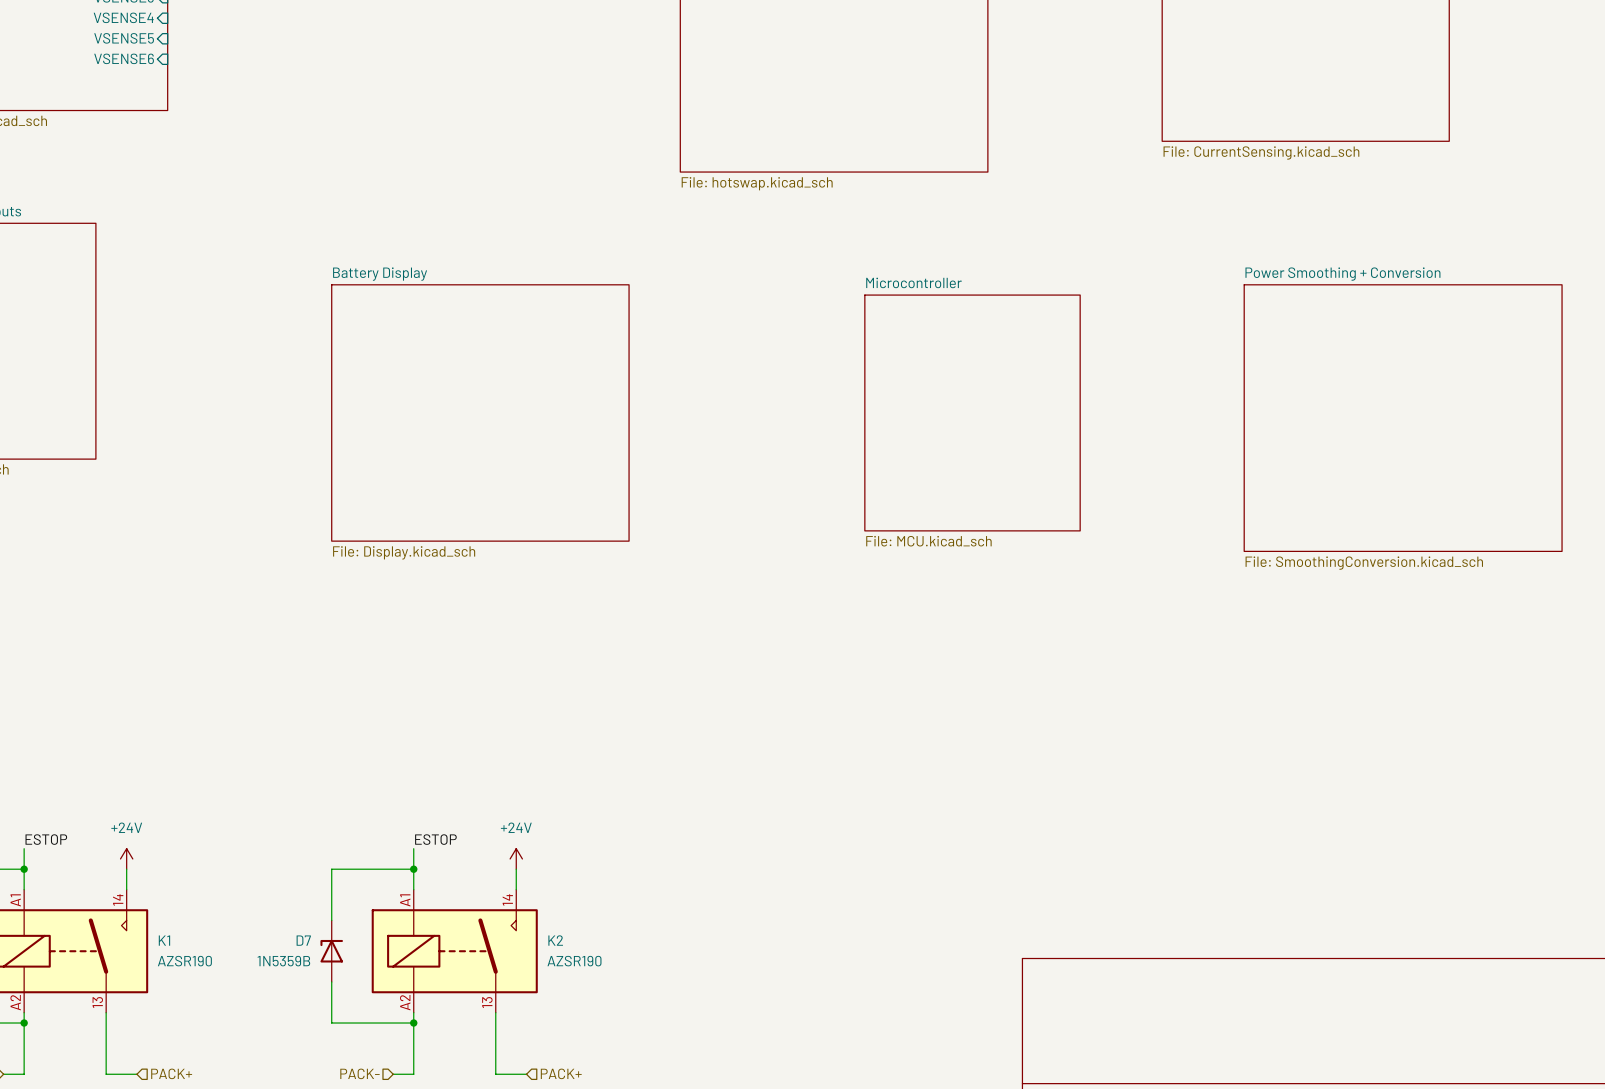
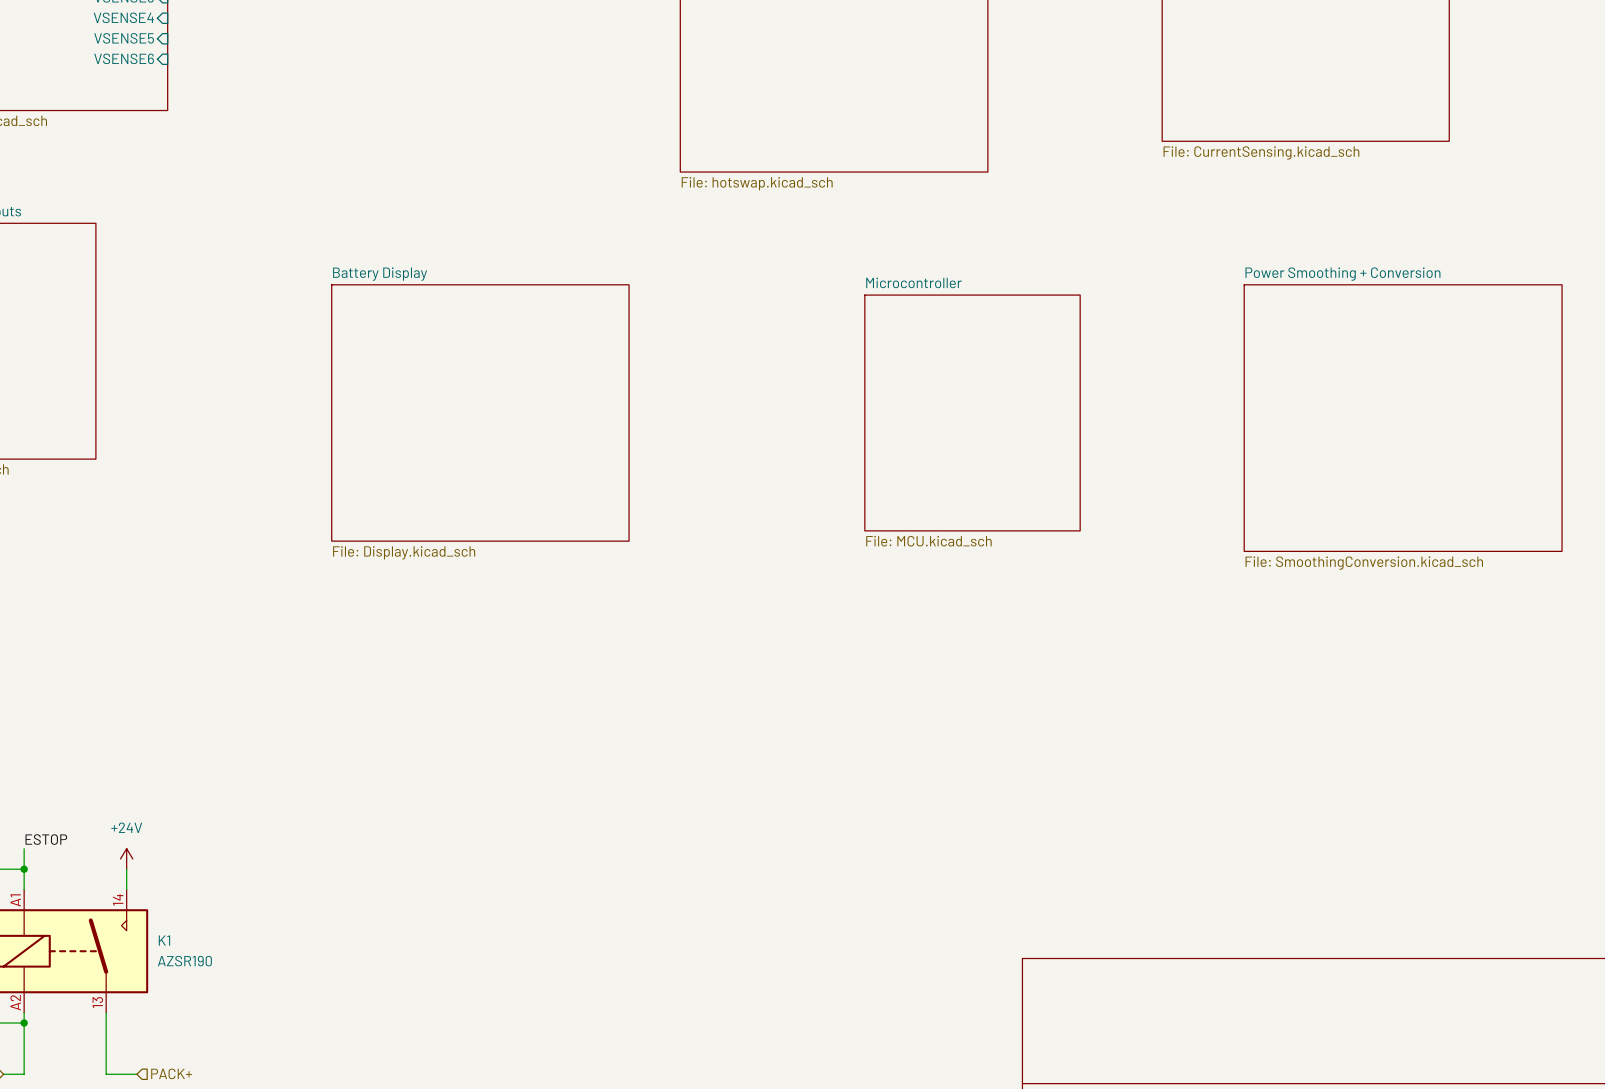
label: ESTOP (435, 839) -> none
wire: (413, 848) (413, 889) -> none
power symbol: +24V (516, 858) -> none
wire: (413, 869) (331, 869) (331, 920) -> none
junction: (413, 869) -> none
wire: (516, 869) (516, 889) -> none
D7: 1N5359B (331, 951) -> none
K2: AZSR190 (454, 951) -> none
wire: (331, 981) (331, 1023) (413, 1023) -> none
wire: (413, 1012) (413, 1074) (393, 1074) -> none
wire: (495, 1012) (495, 1074) (526, 1074) -> none
junction: (413, 1023) -> none
hierarchical label: PACK- (359, 1073) -> none
hierarchical label: PACK+ (561, 1073) -> none

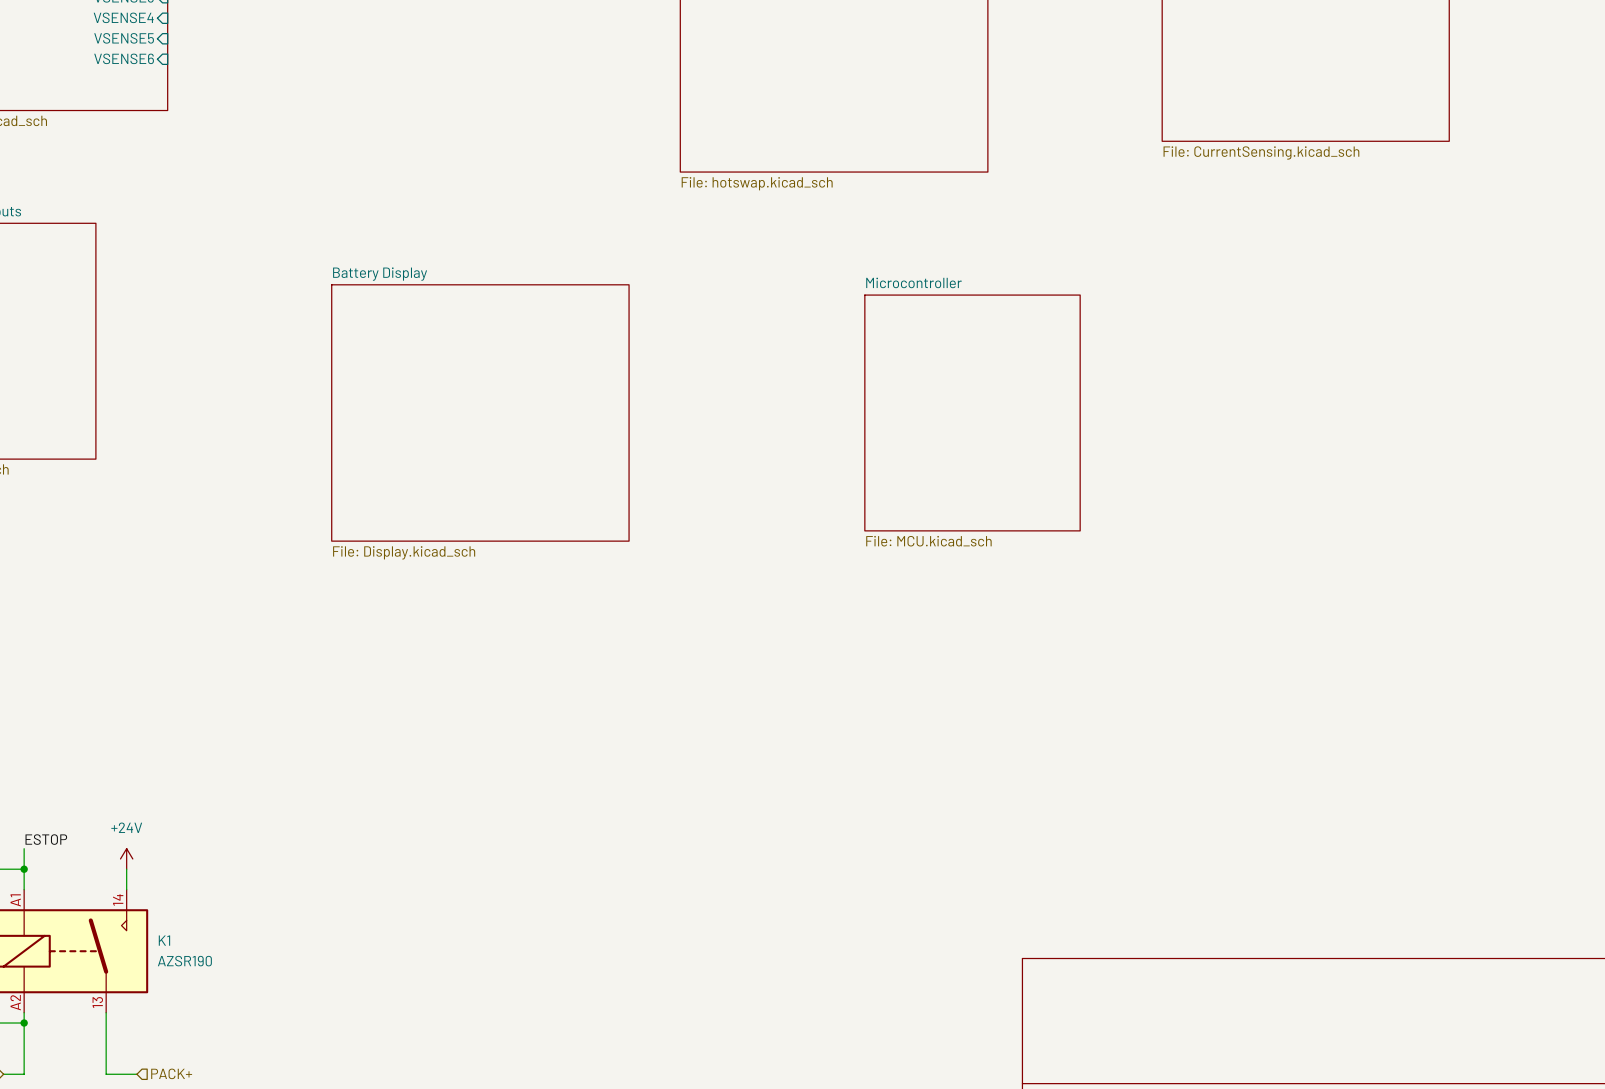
sheet Power Smoothing + Conversion: File: SmoothingConversion.kicad_sch (1403, 418) -> none

